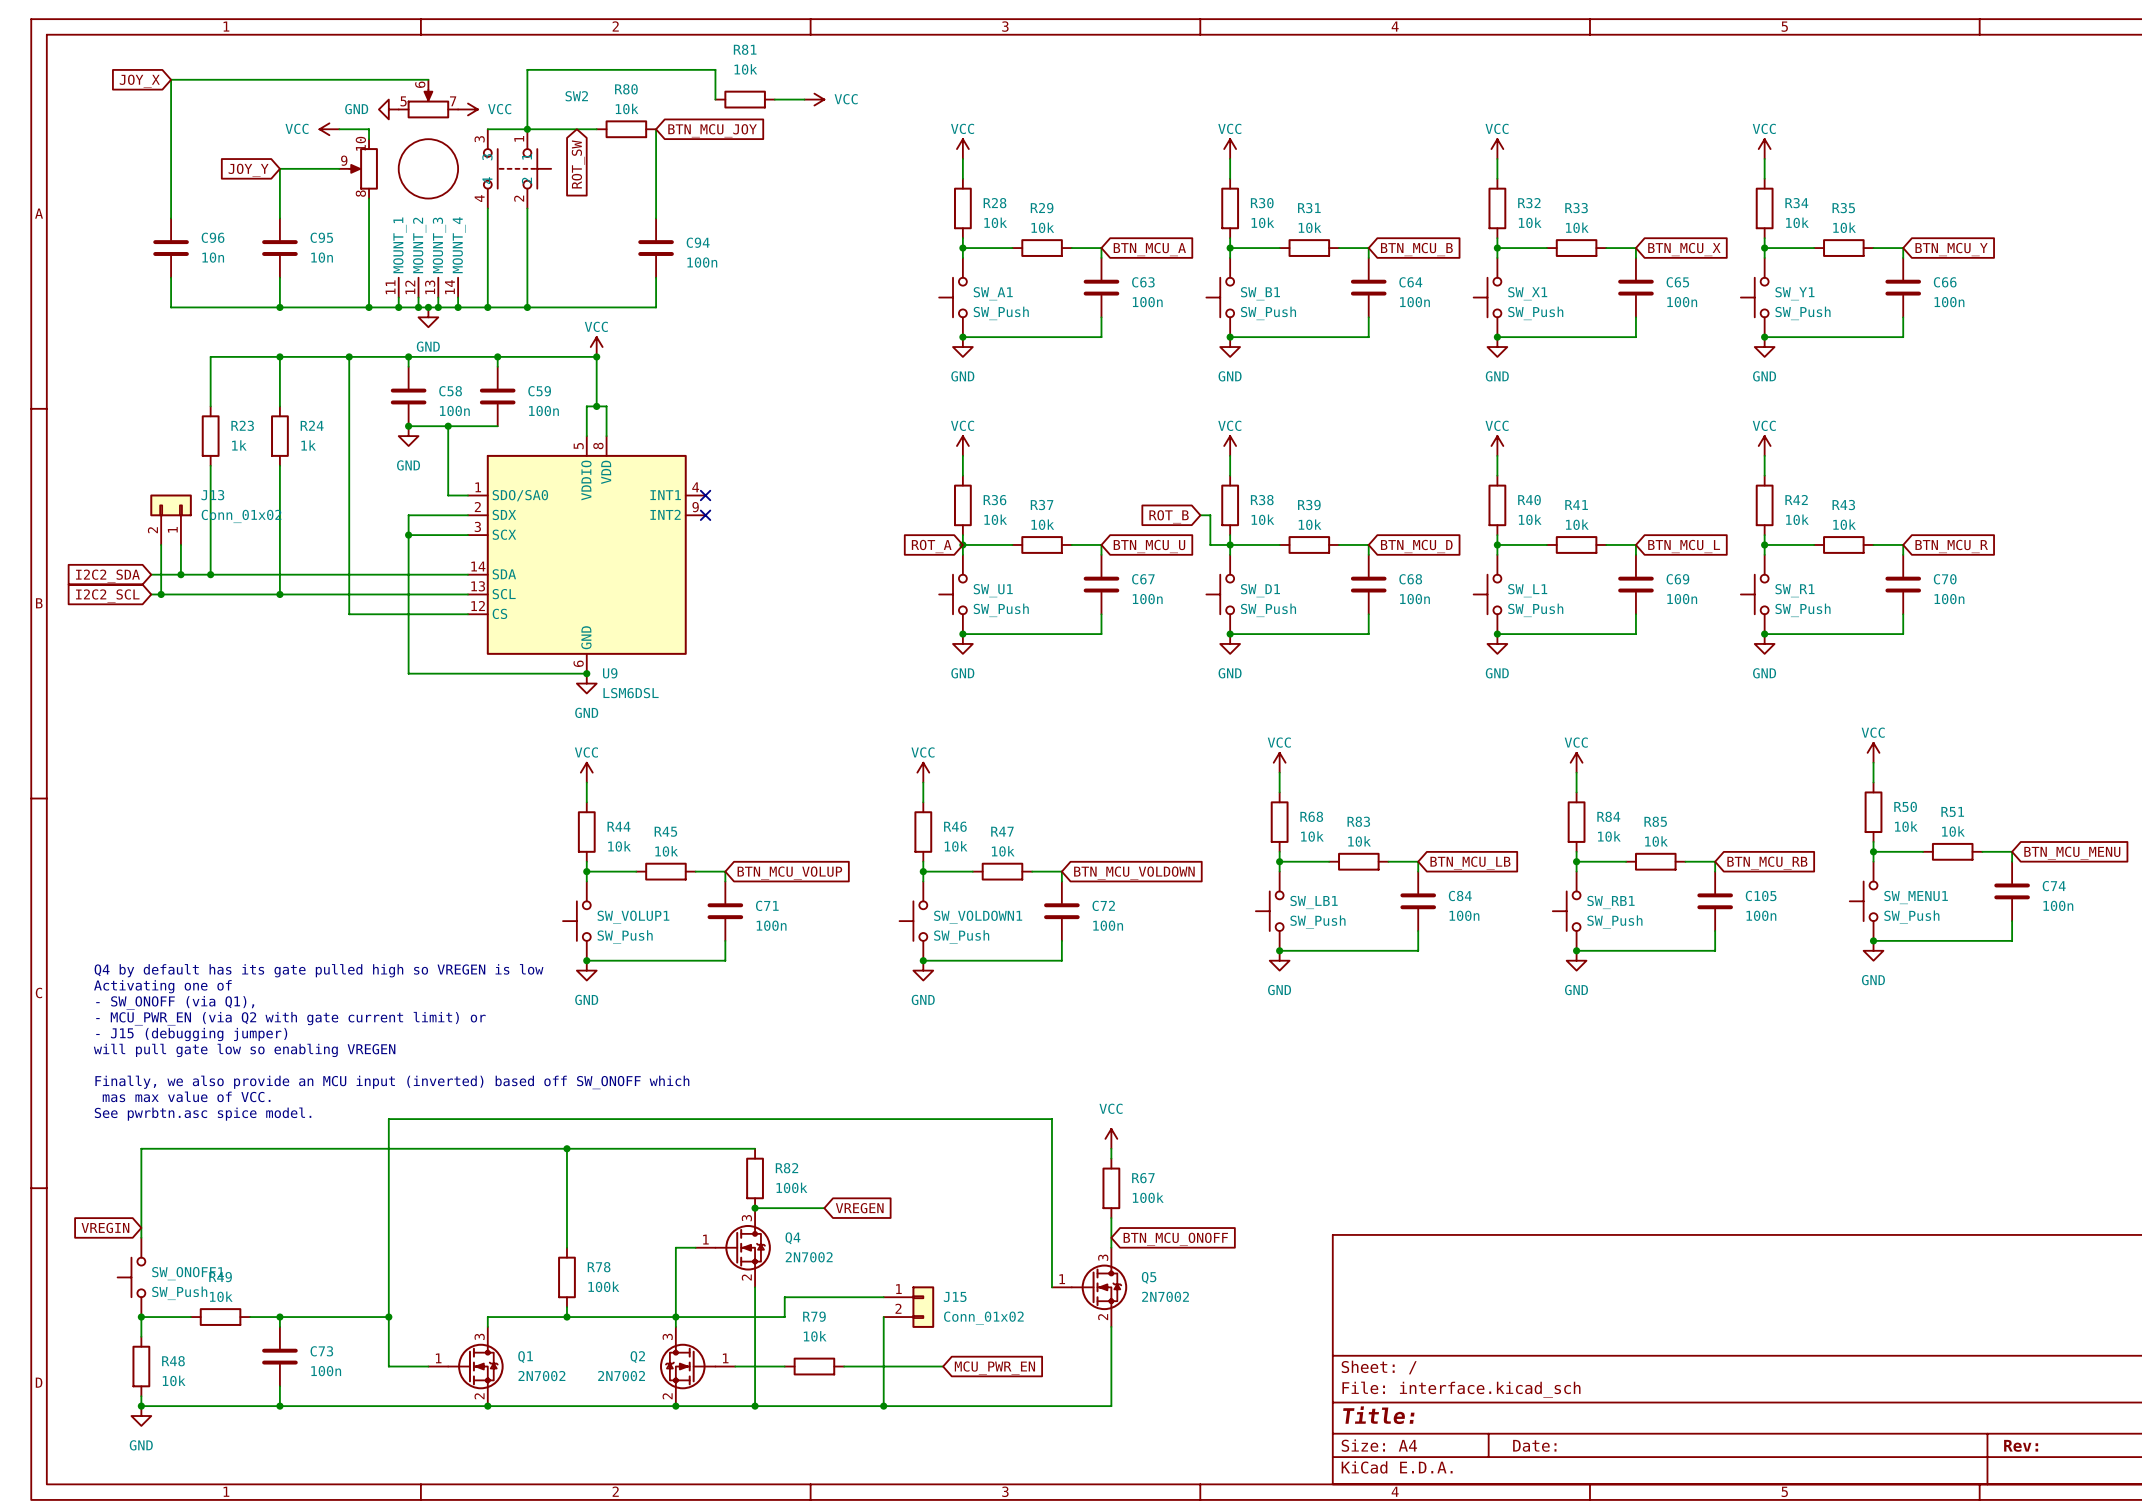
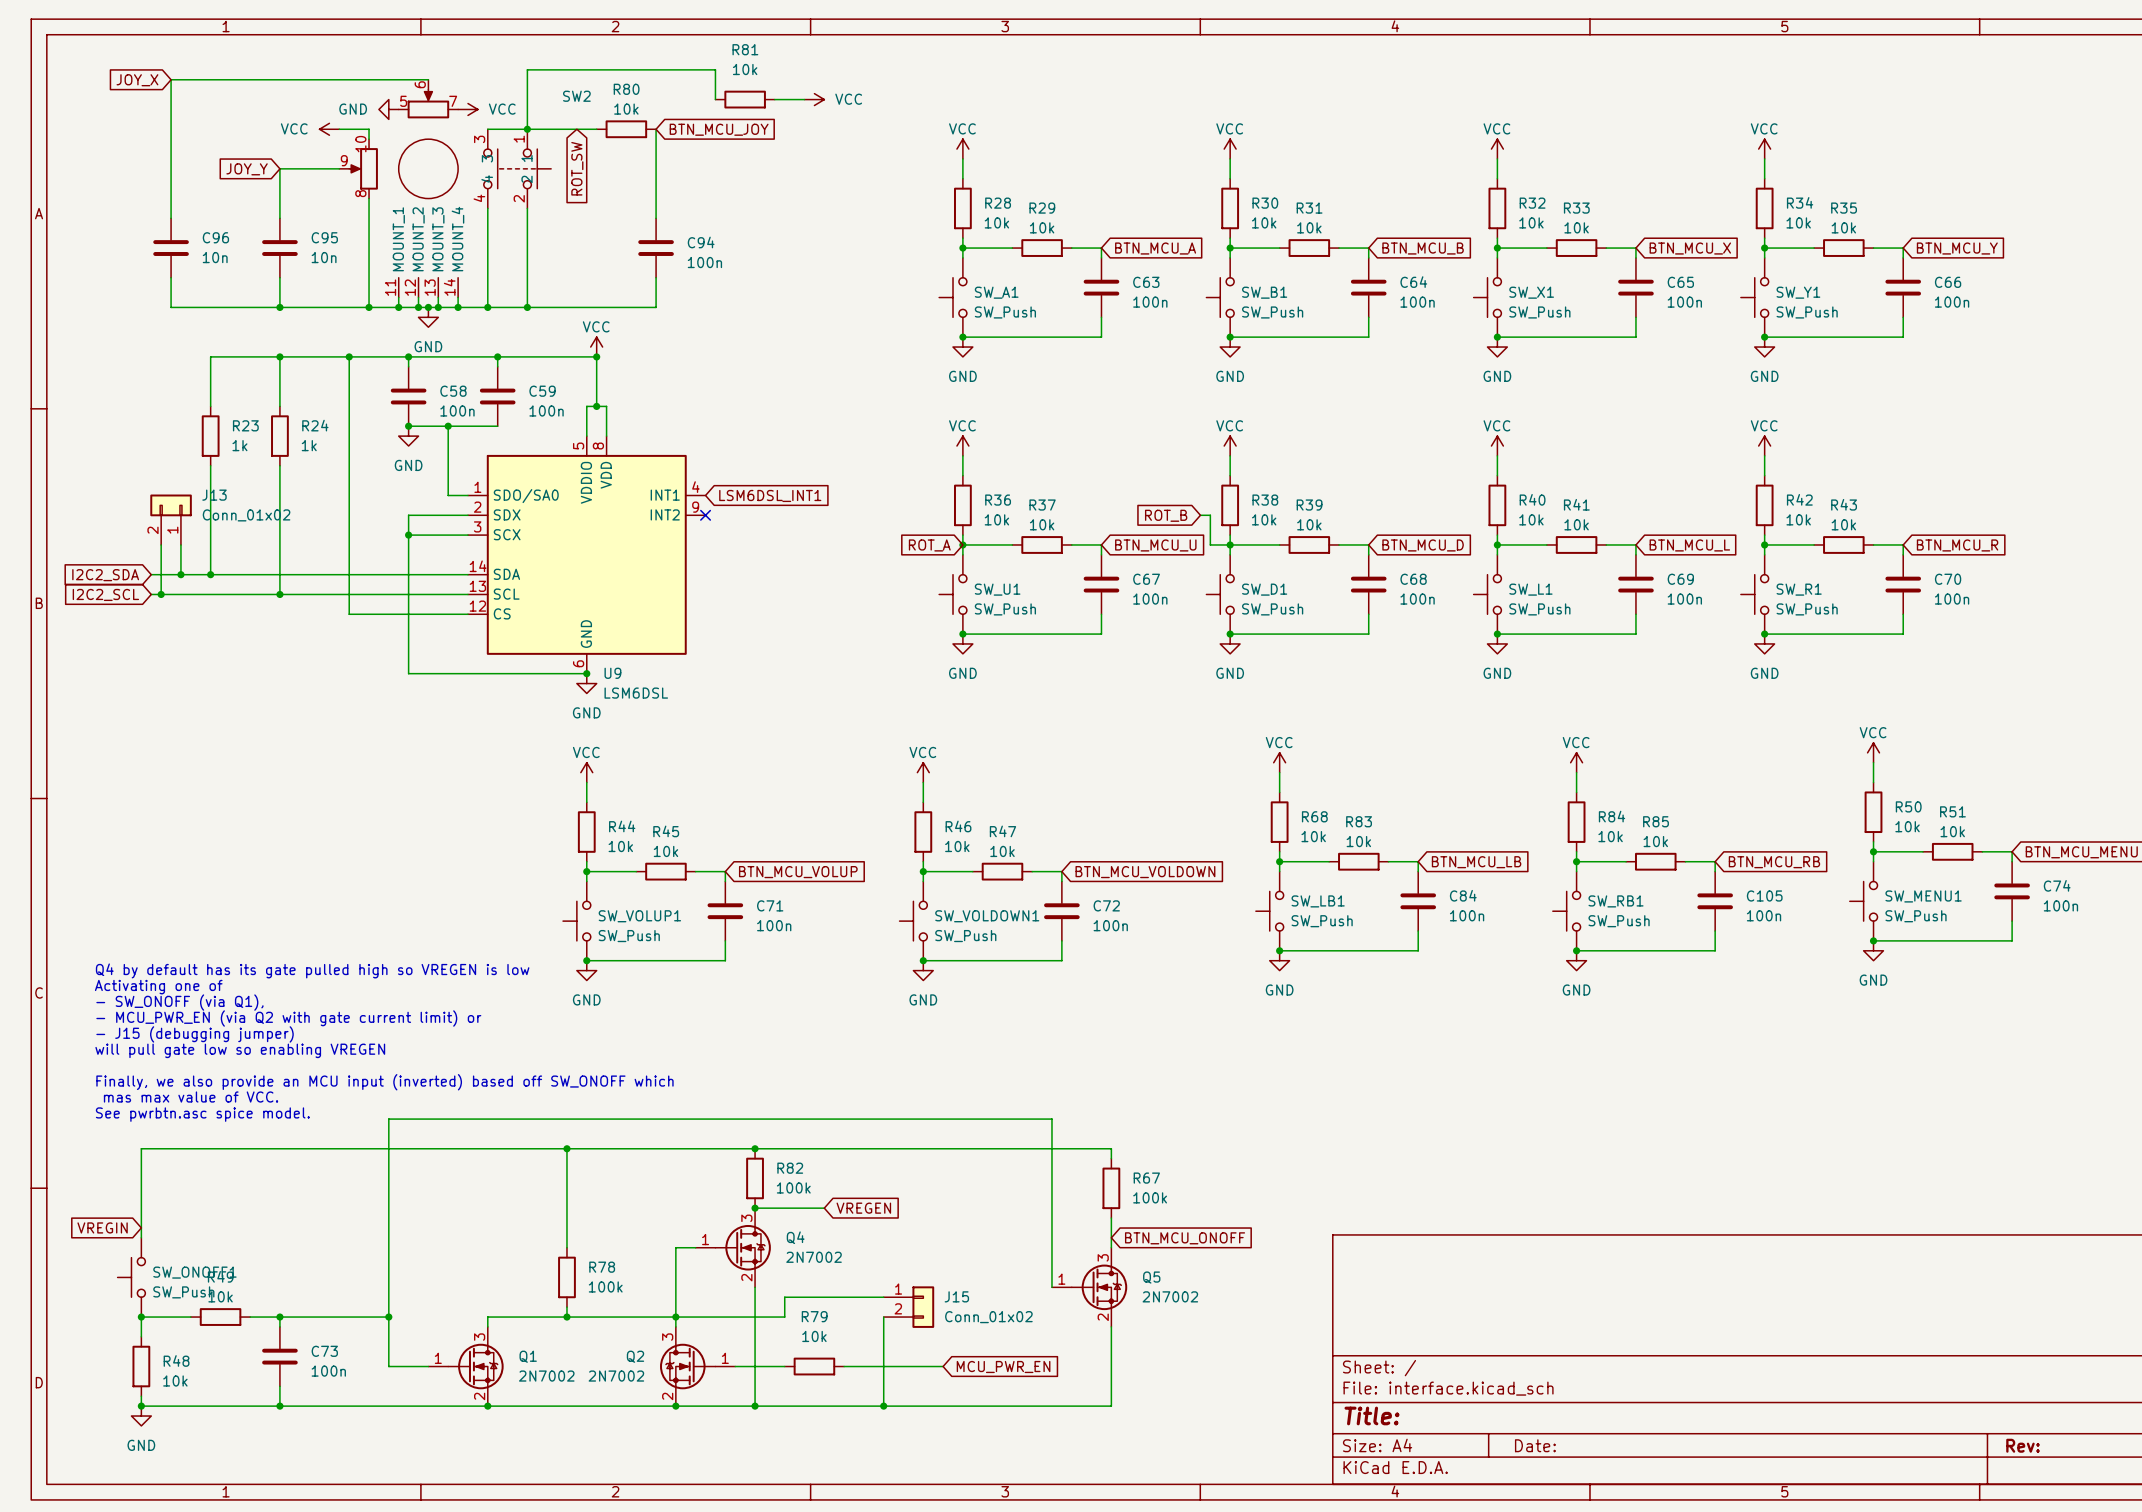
no-connect mark: (705, 495) -> none
global label: none -> LSM6DSL_INT1 (770, 495)
power symbol: VCC (1111, 1138) -> none
wire: none -> (755, 1148) (1111, 1148)
junction: none -> (755, 1148)

